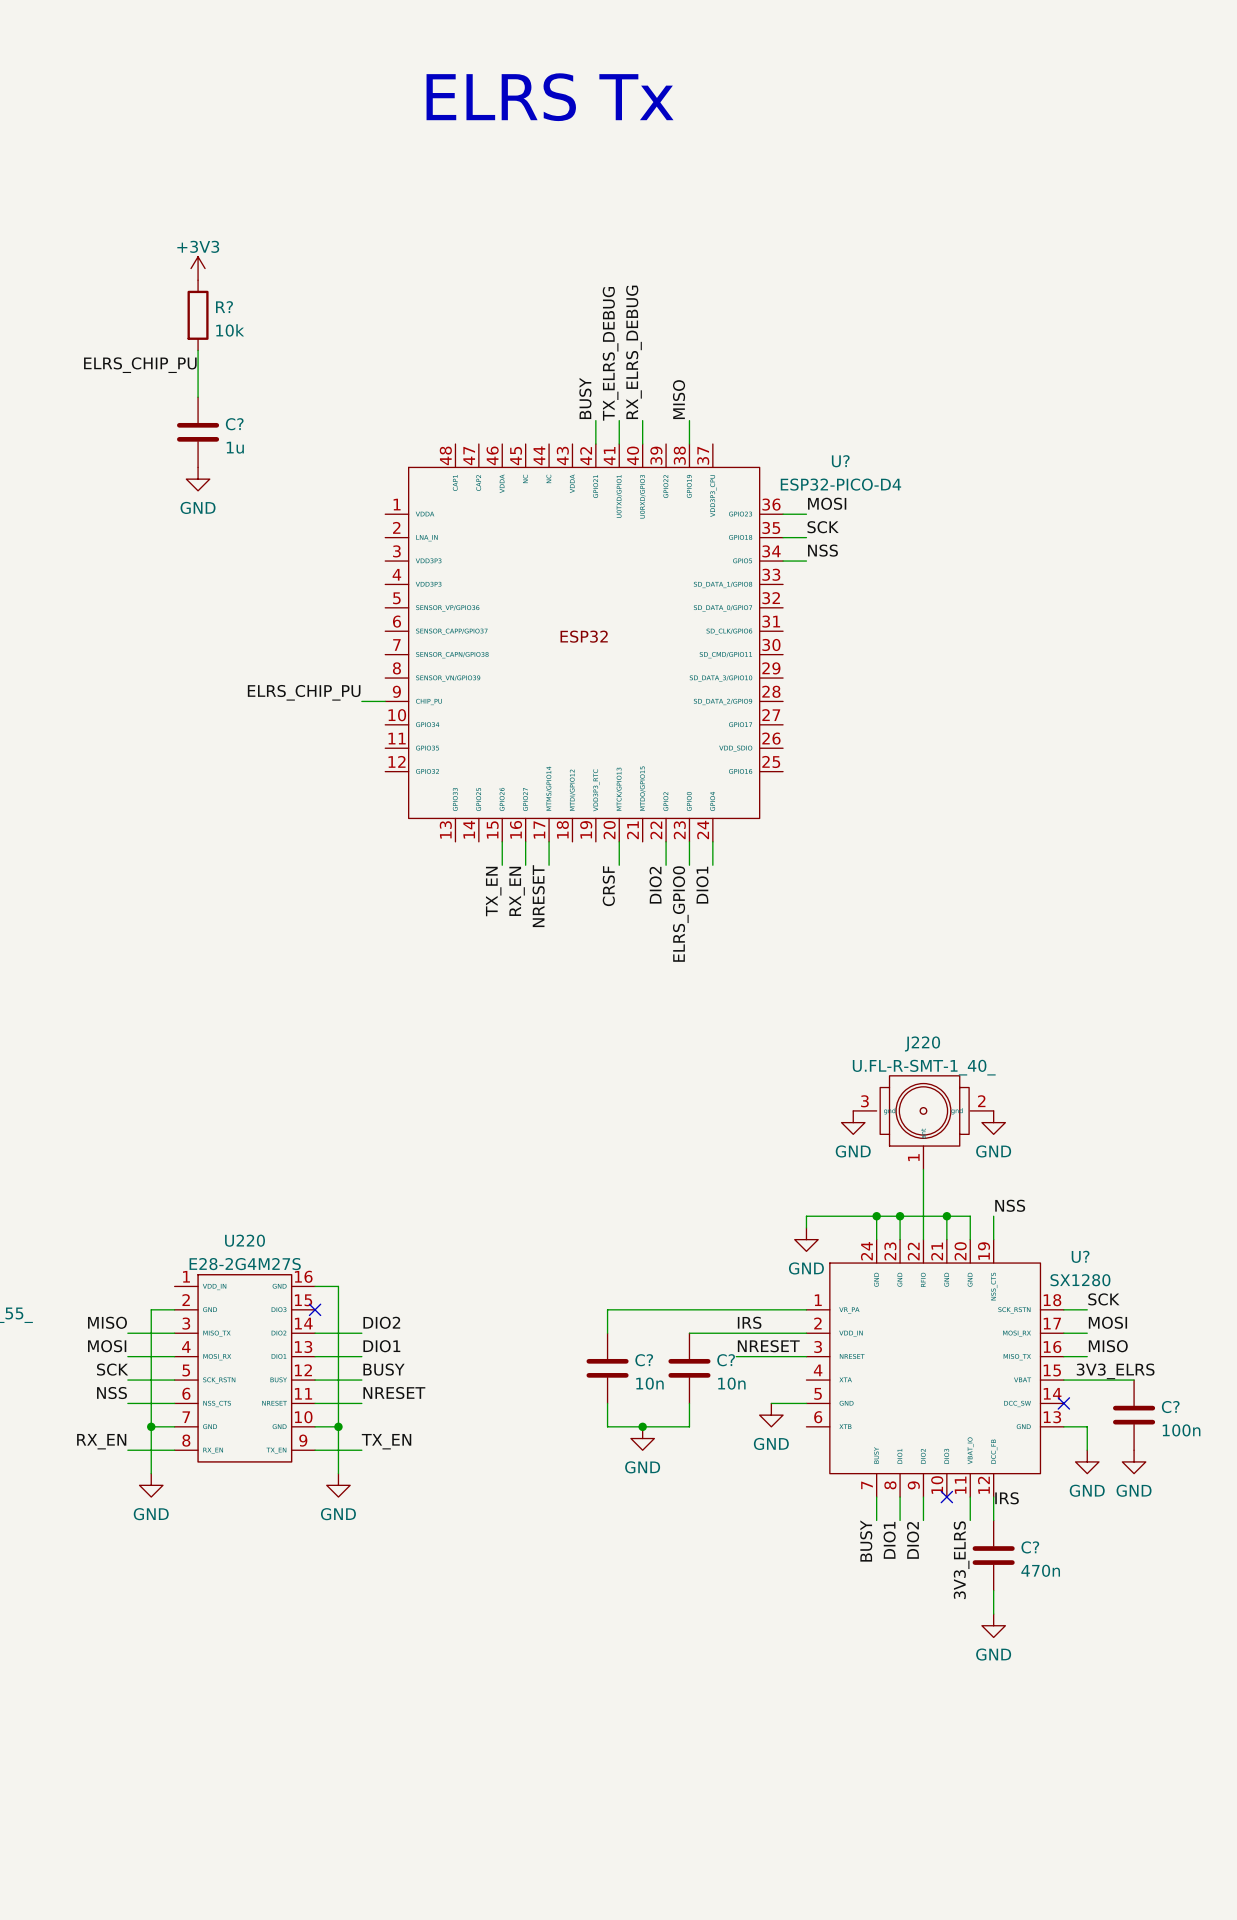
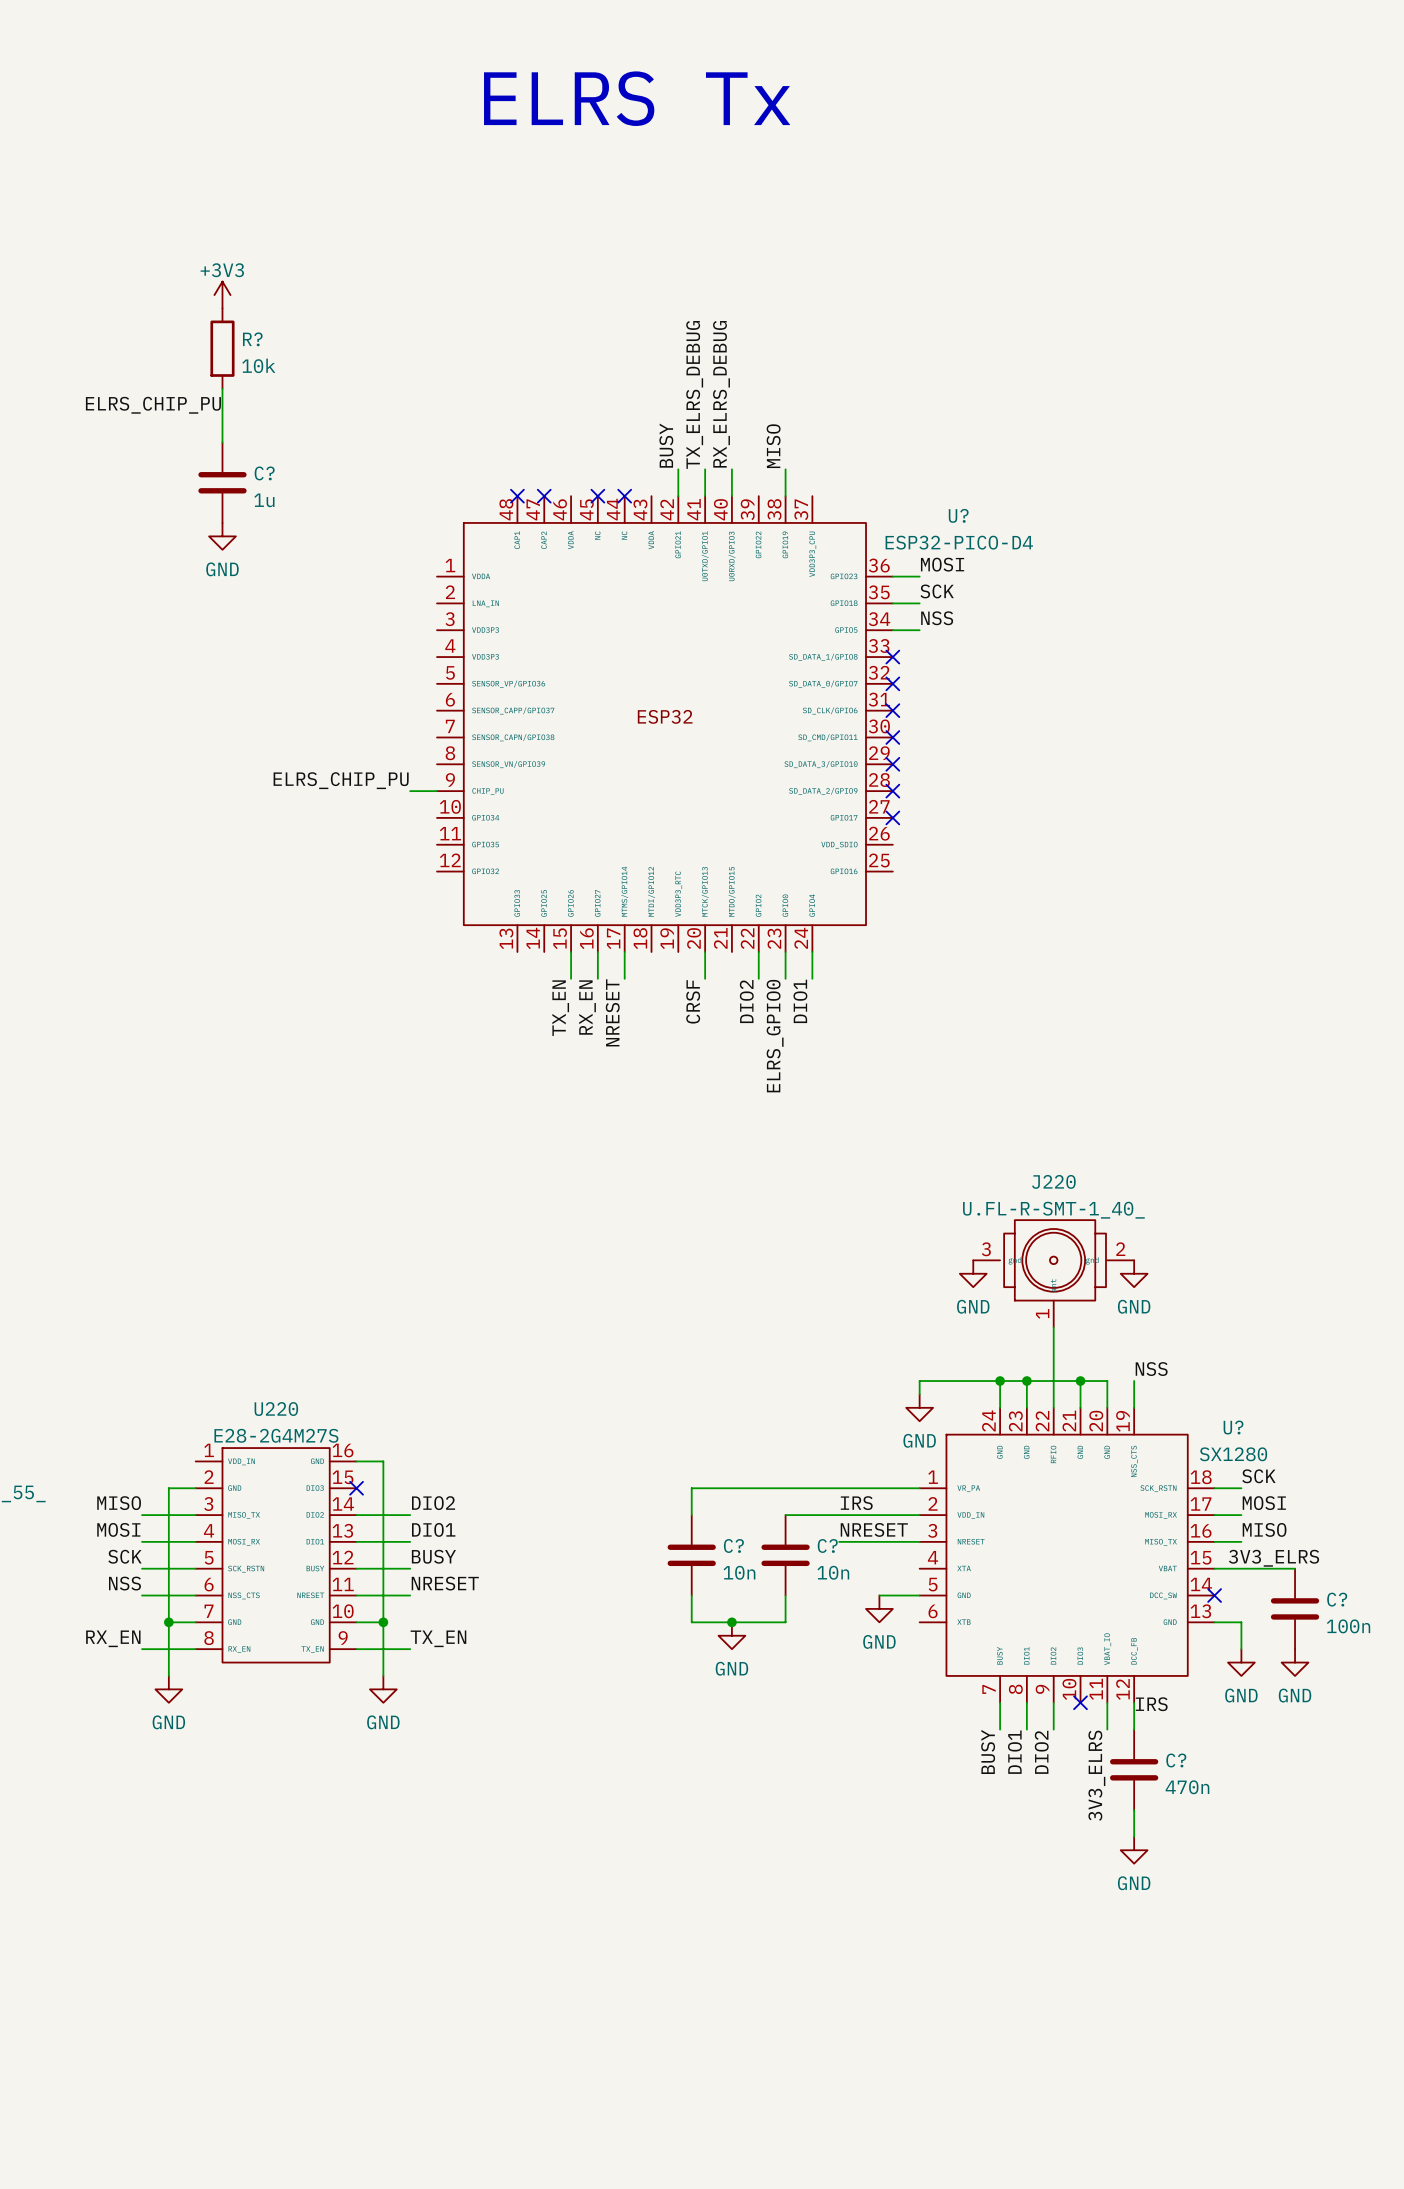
no-connect mark: none -> (517, 496)
no-connect mark: none -> (544, 496)
no-connect mark: none -> (597, 496)
no-connect mark: none -> (624, 496)
no-connect mark: none -> (892, 657)
no-connect mark: none -> (892, 683)
no-connect mark: none -> (892, 710)
no-connect mark: none -> (892, 737)
no-connect mark: none -> (892, 764)
no-connect mark: none -> (892, 791)
no-connect mark: none -> (892, 817)

